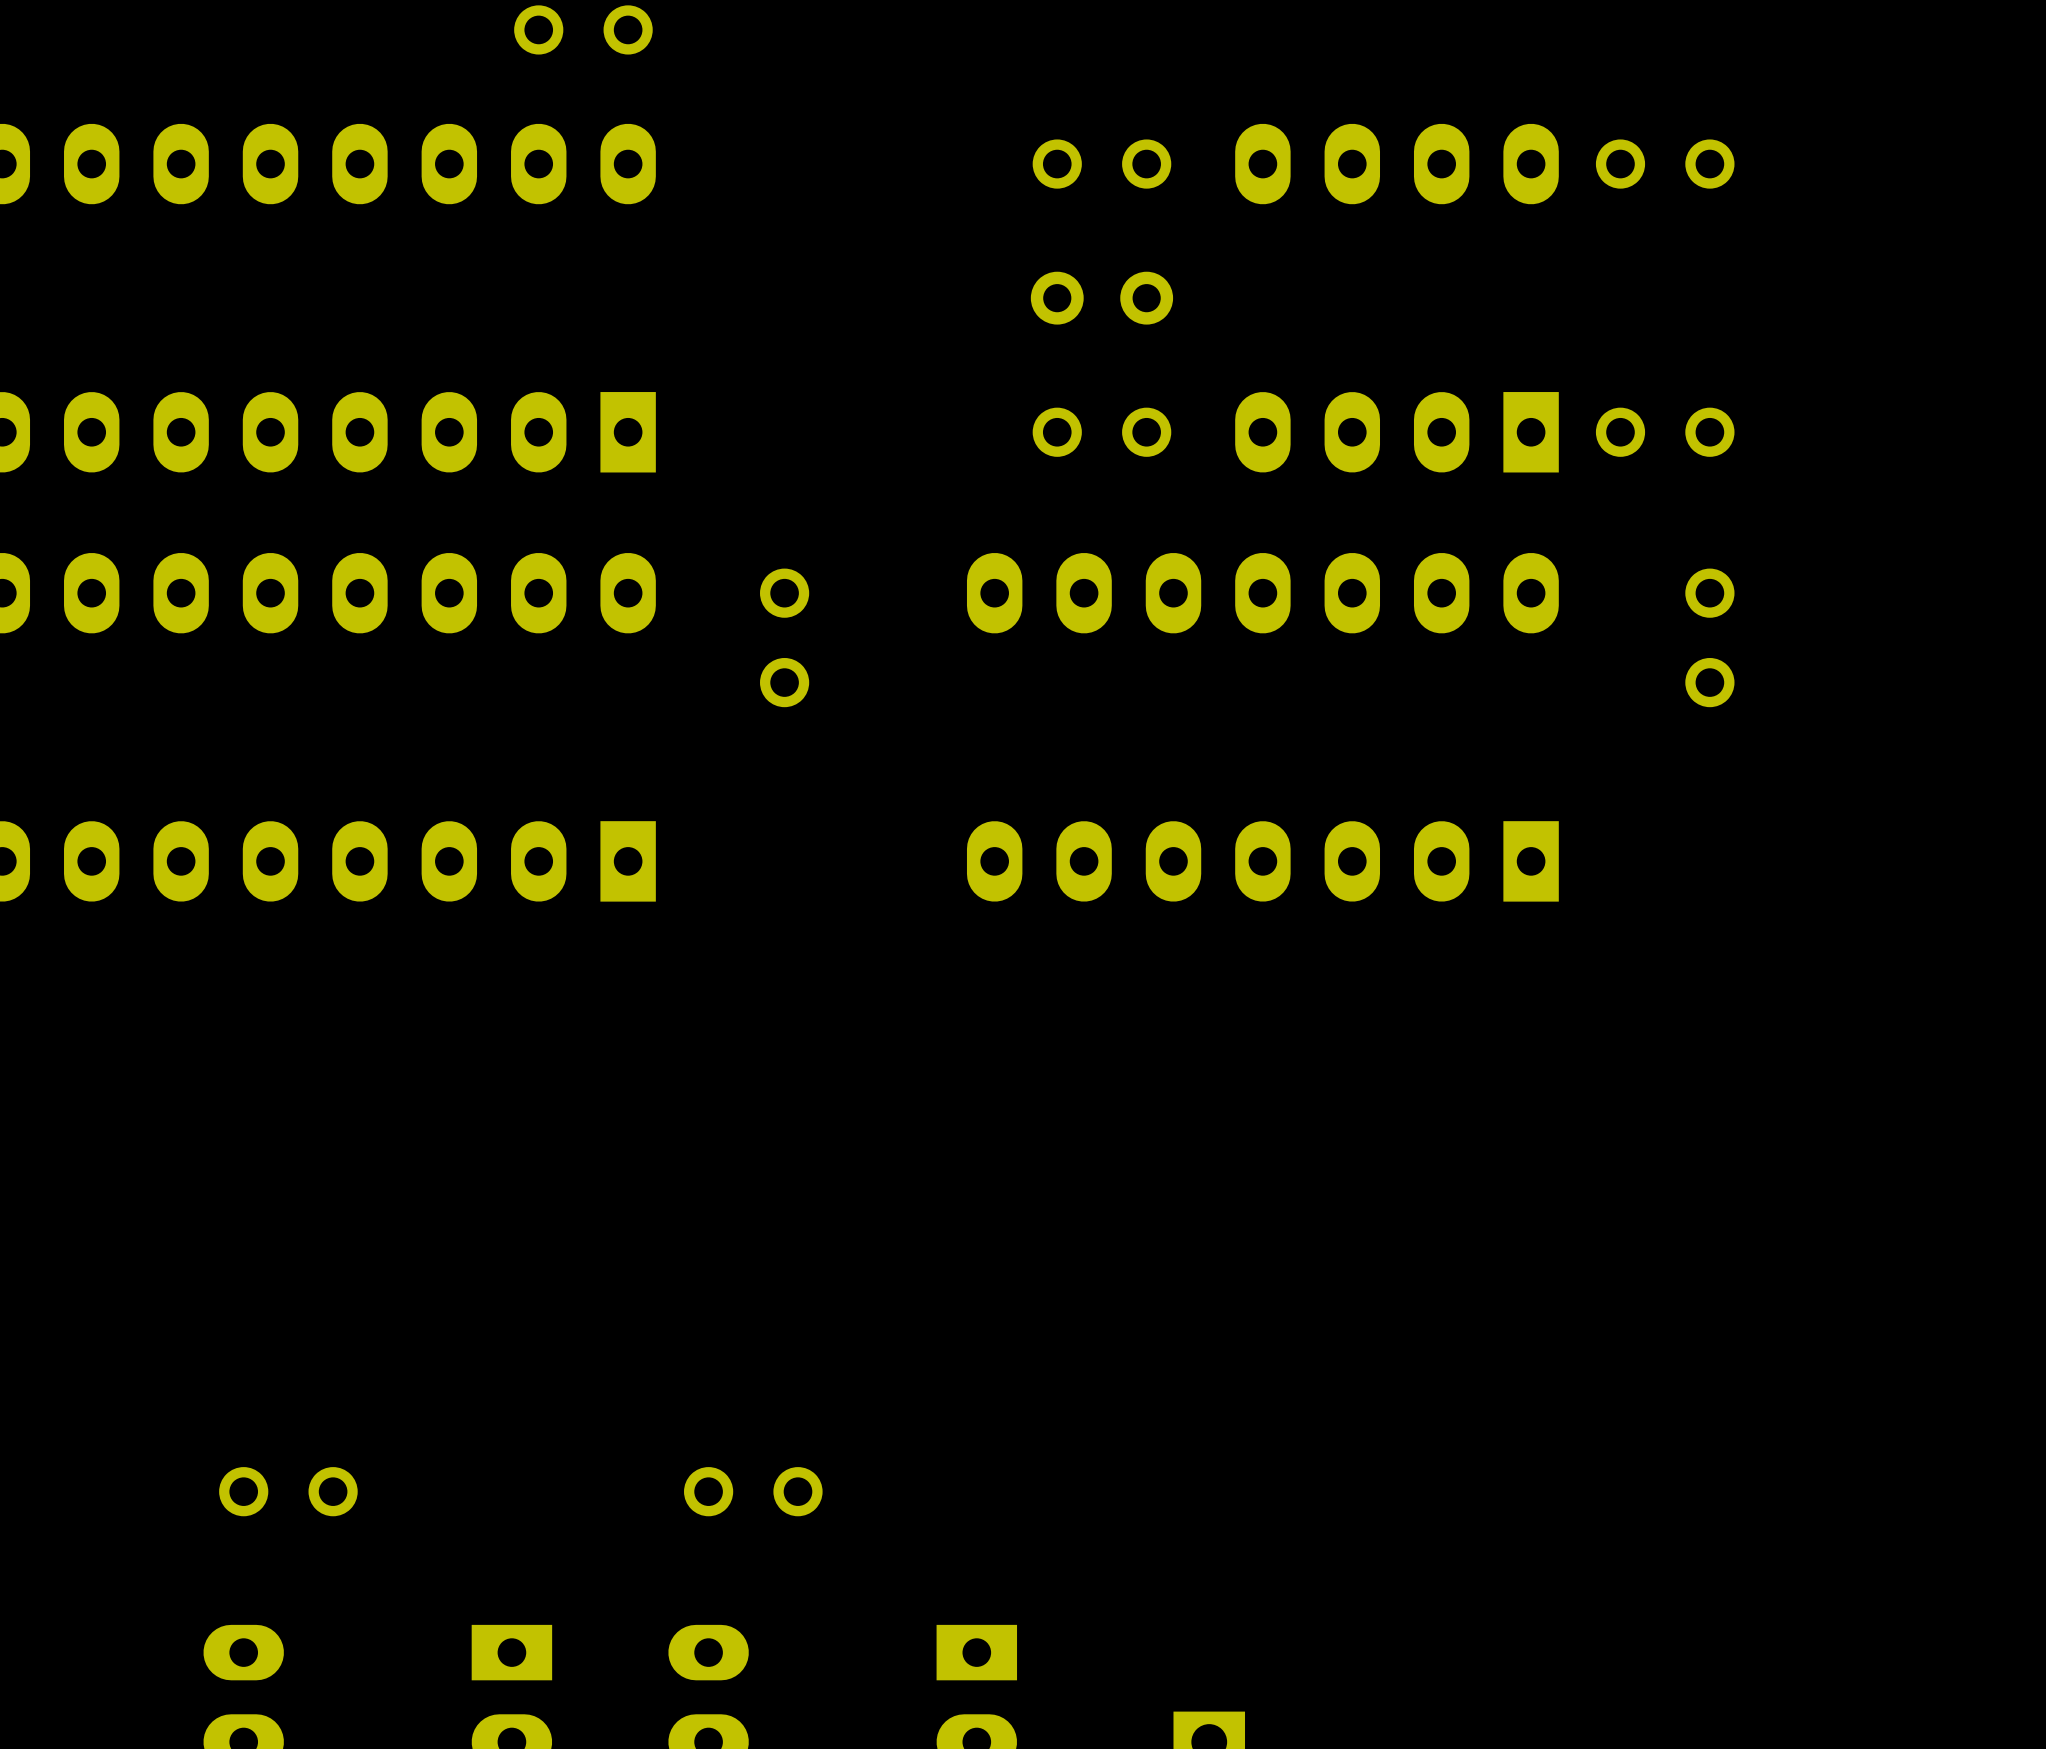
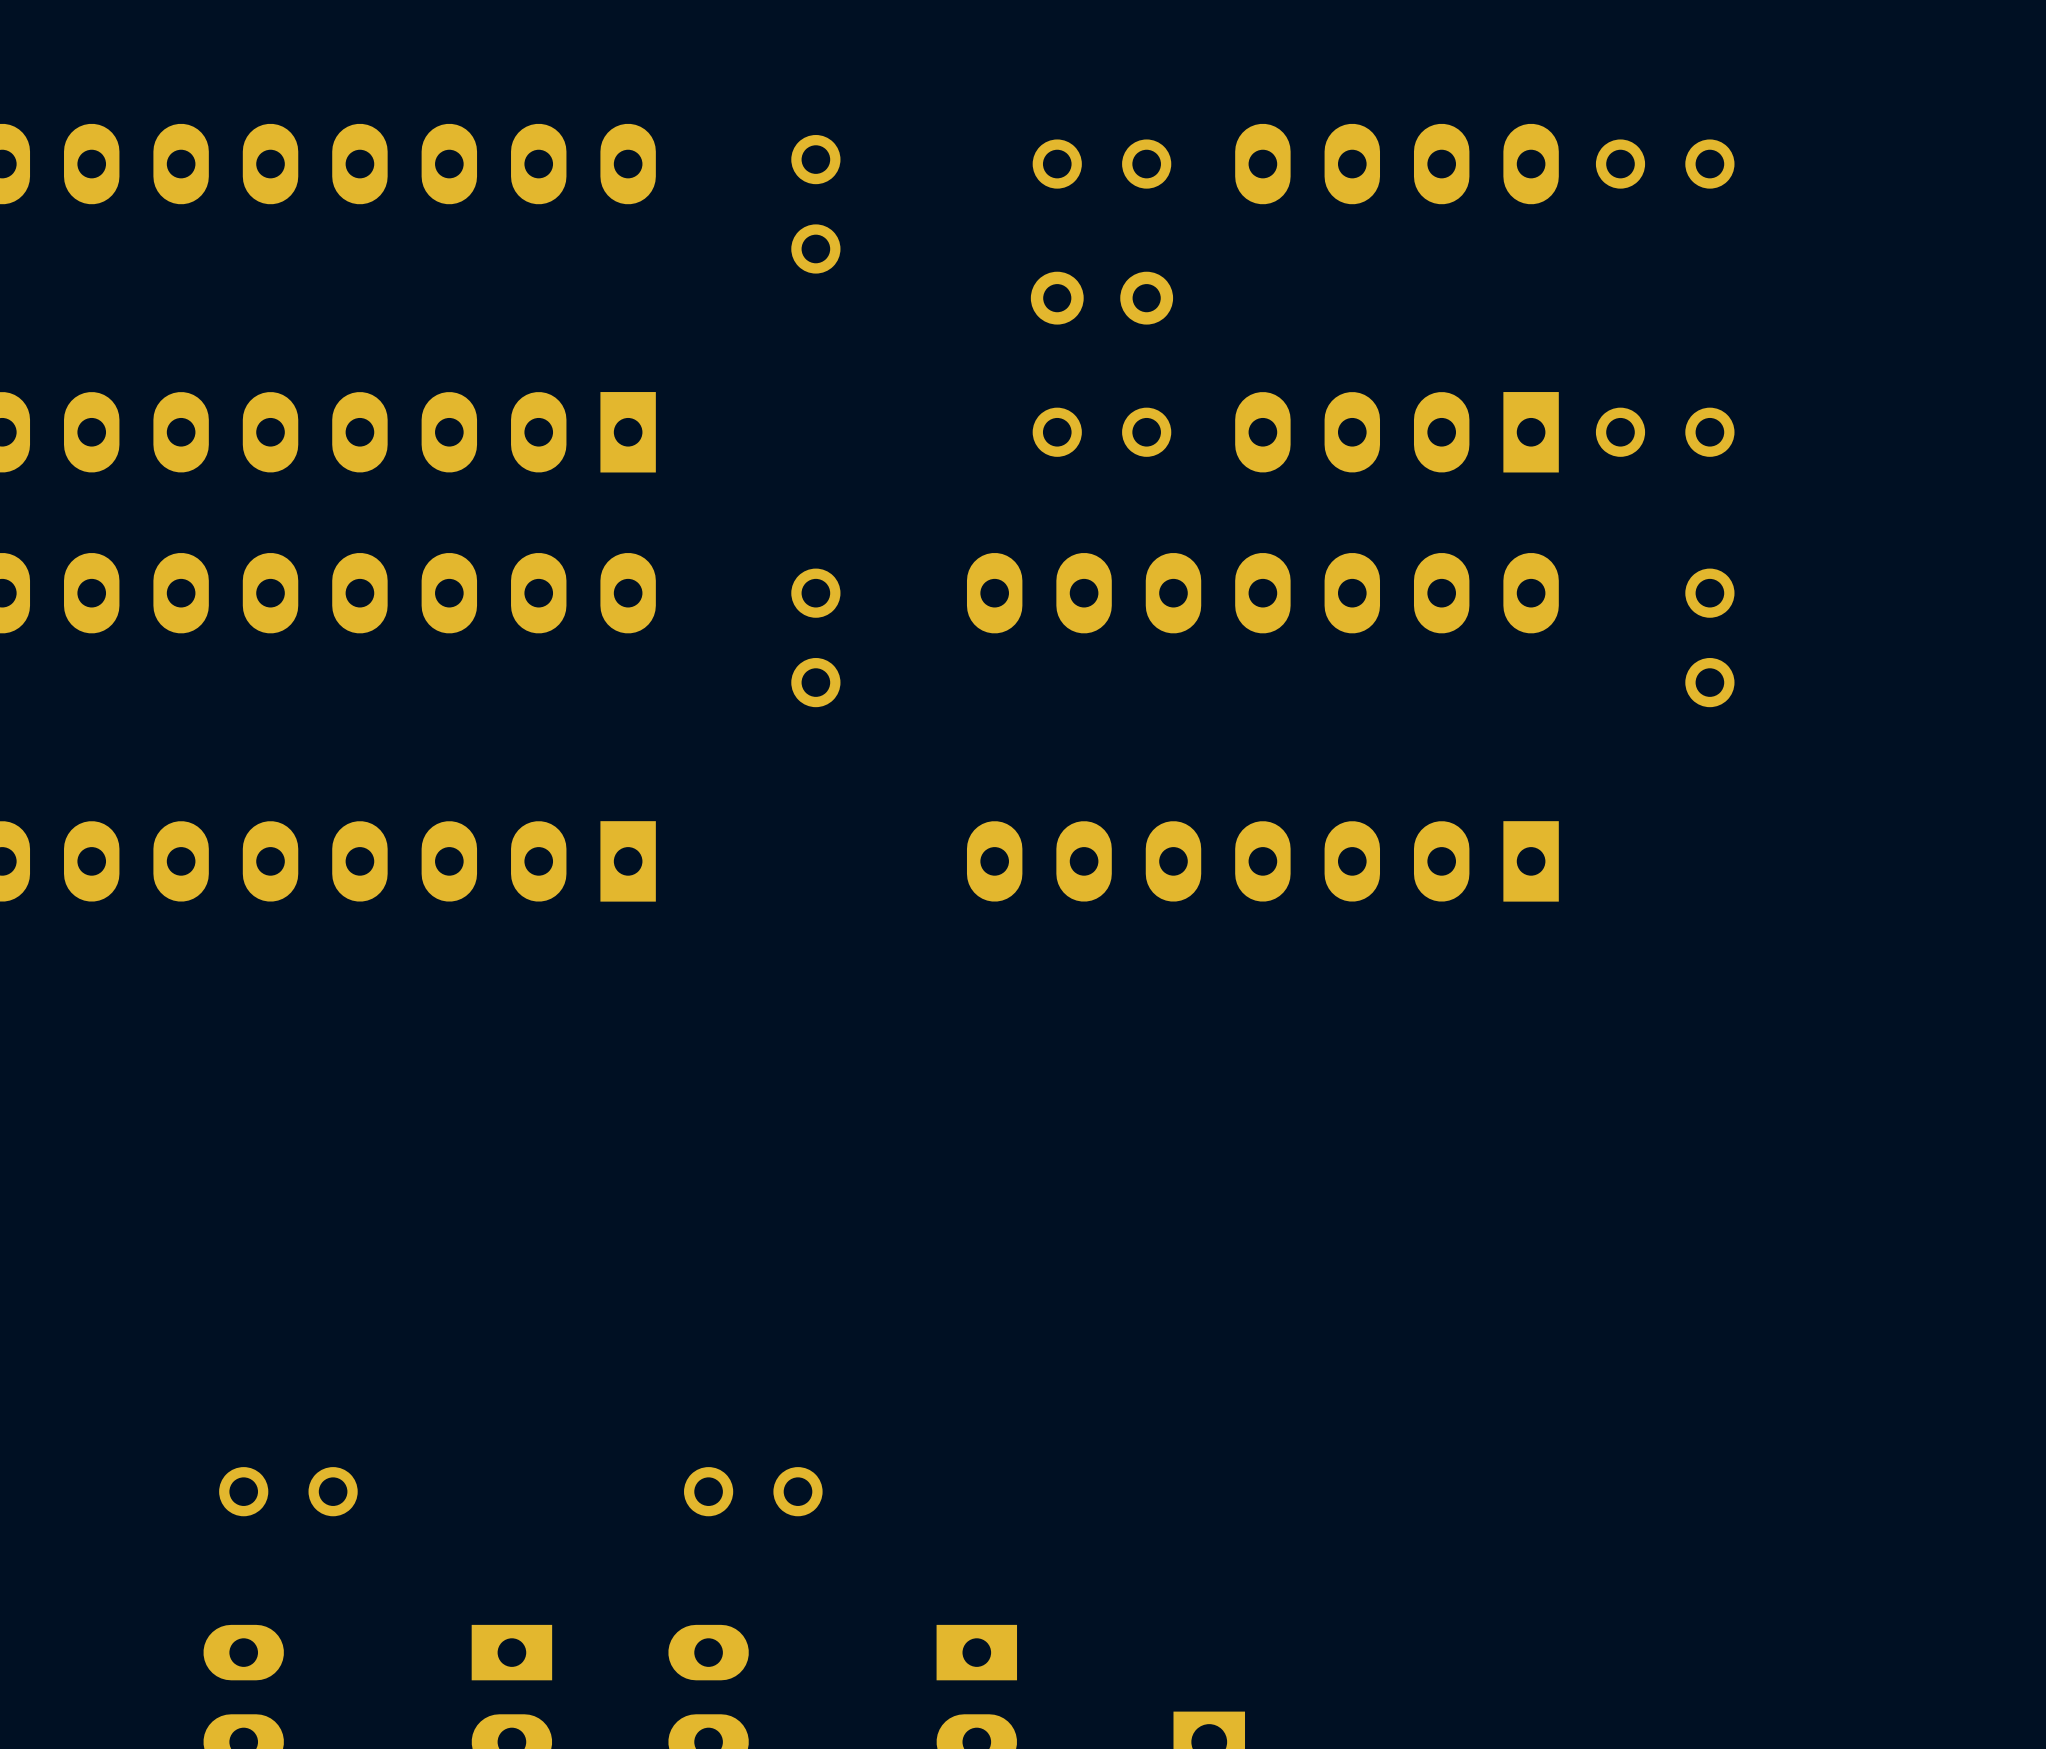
part rotation: 0° (583, 29) -> 90° clockwise (815, 204)
part position: (583, 29) -> (815, 204)
part position: (784, 637) -> (815, 637)

